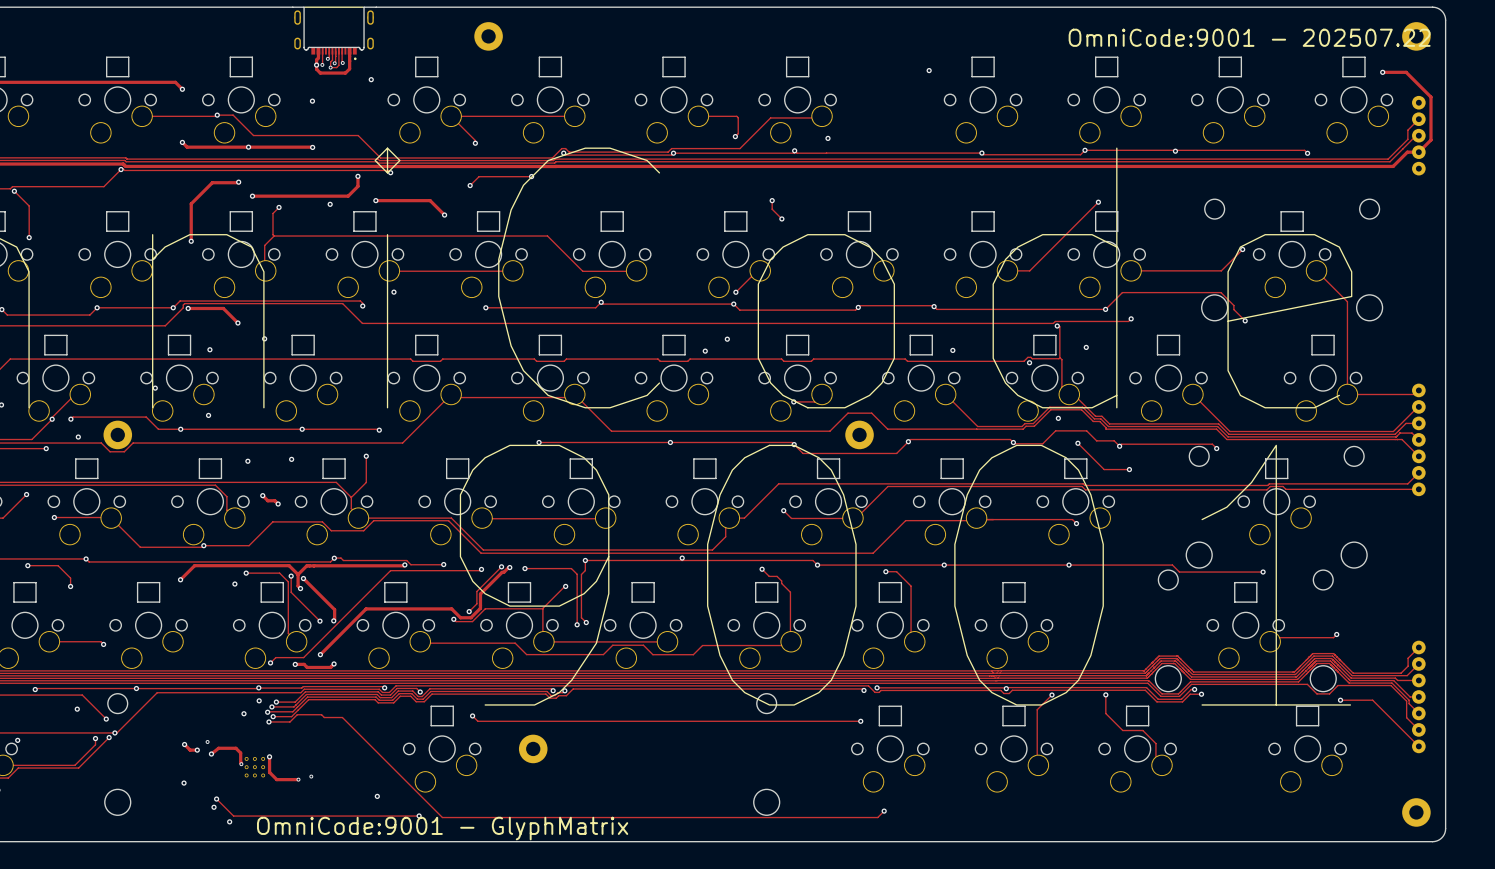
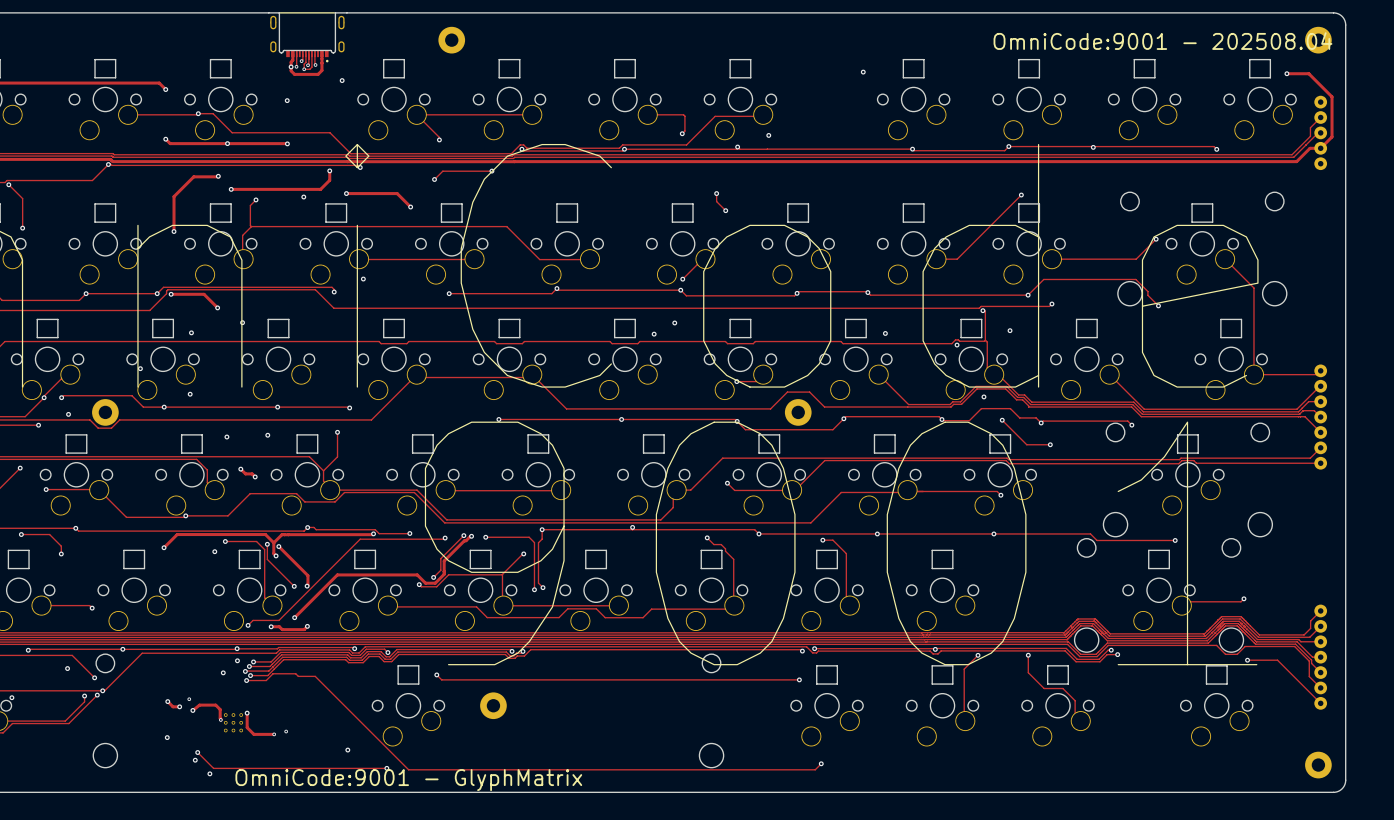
text: OmniCode:9001 - 202507.22 (1249, 37) -> OmniCode:9001 - 202508.04 (1162, 41)

